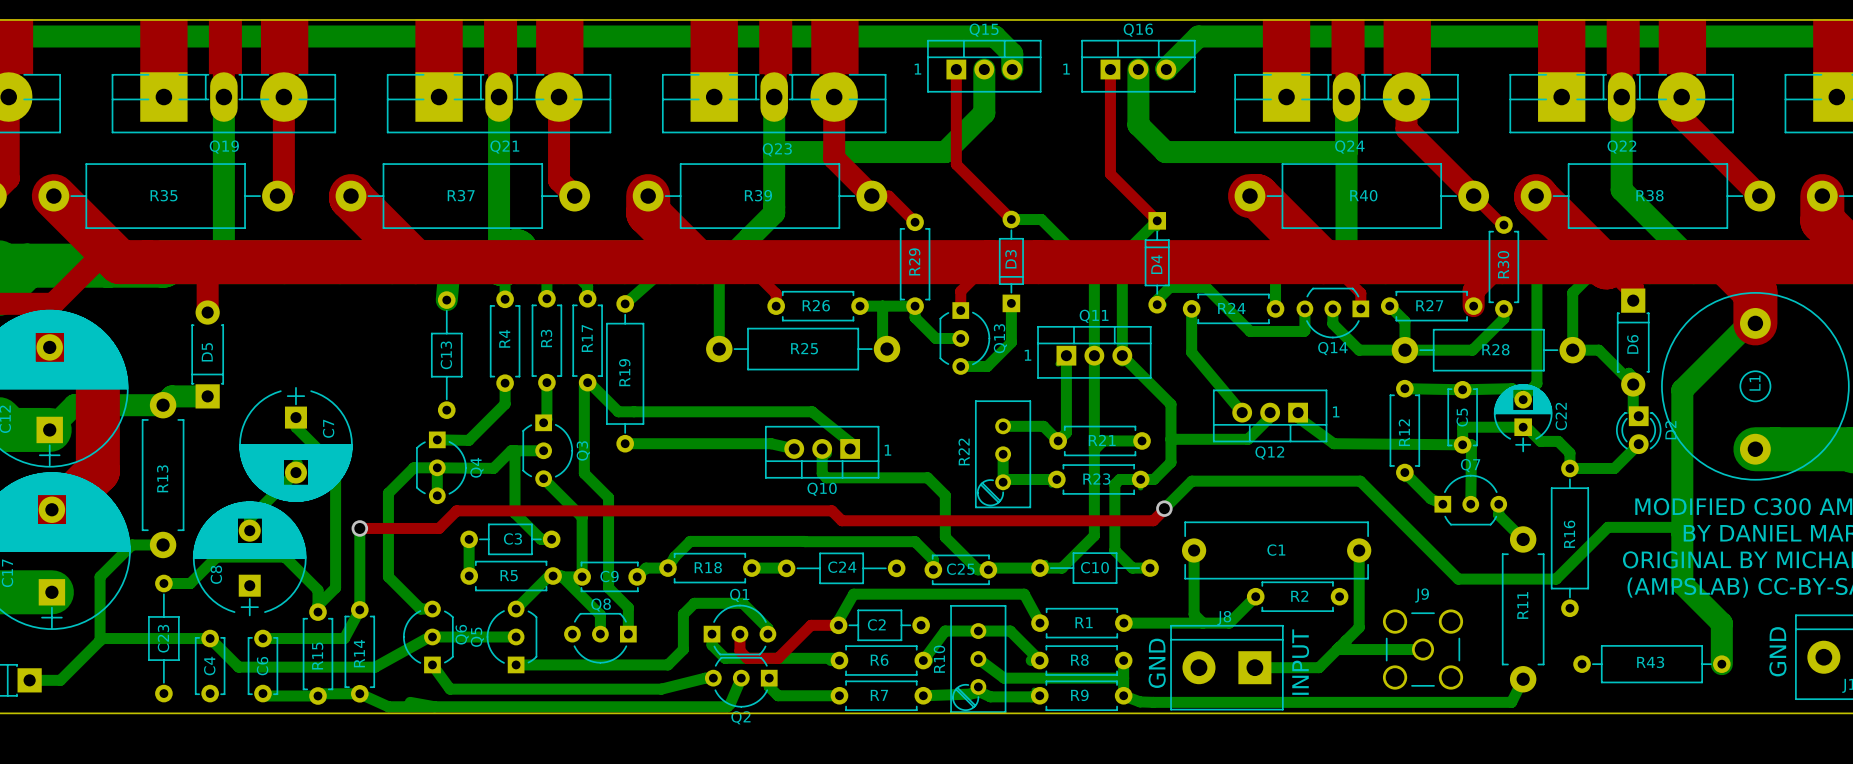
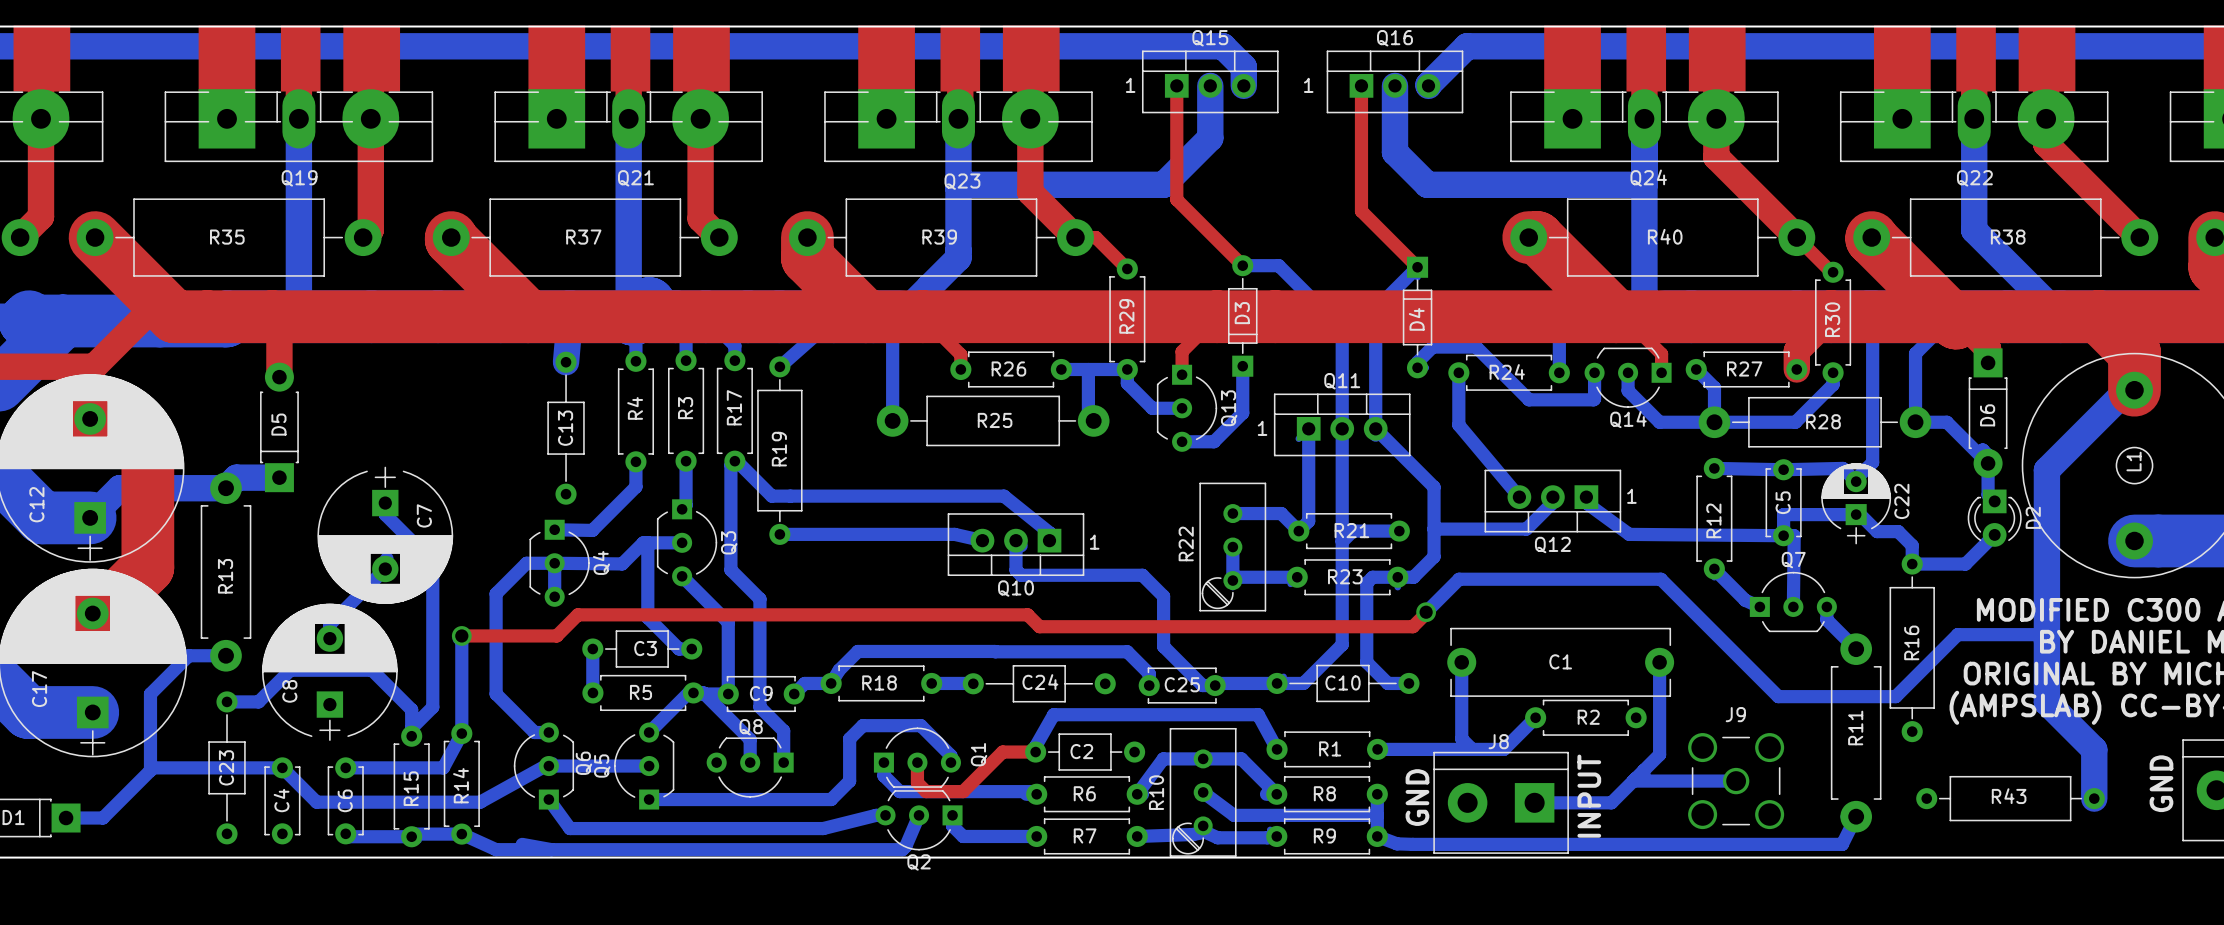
Q1 name rotation: 0° (739, 595) -> 90° counterclockwise (979, 754)
Q1 name position: Q1 (739, 595) -> Q1 (979, 754)

